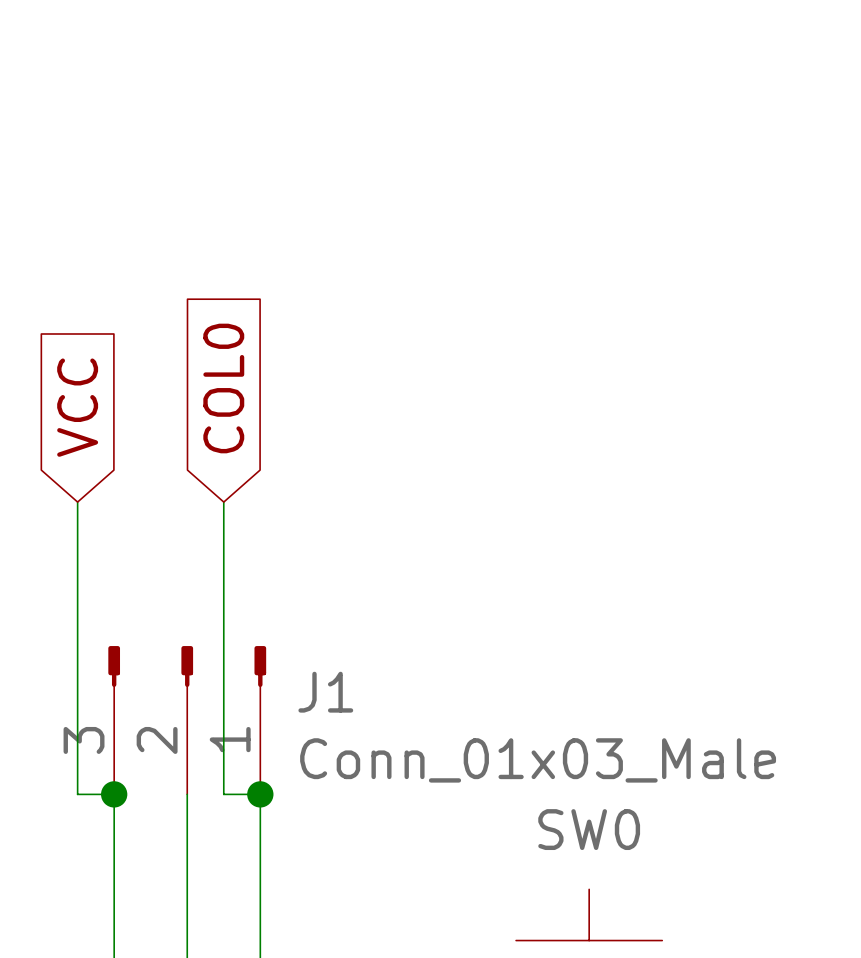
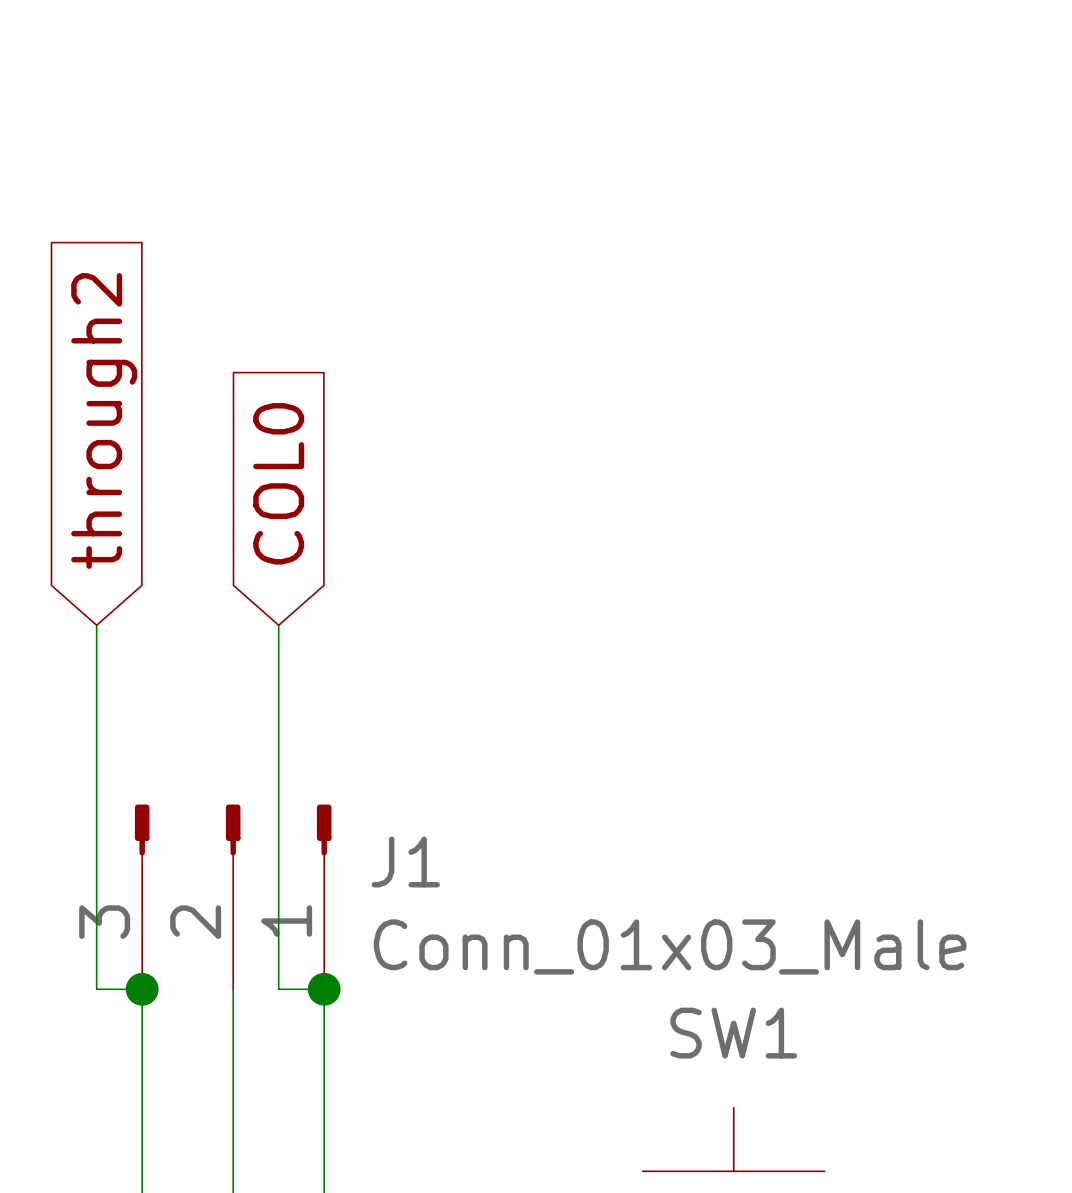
global label: VCC (77, 407) -> through2 (104, 420)
SW0 name: SW0 (589, 829) -> SW1 (733, 1033)

